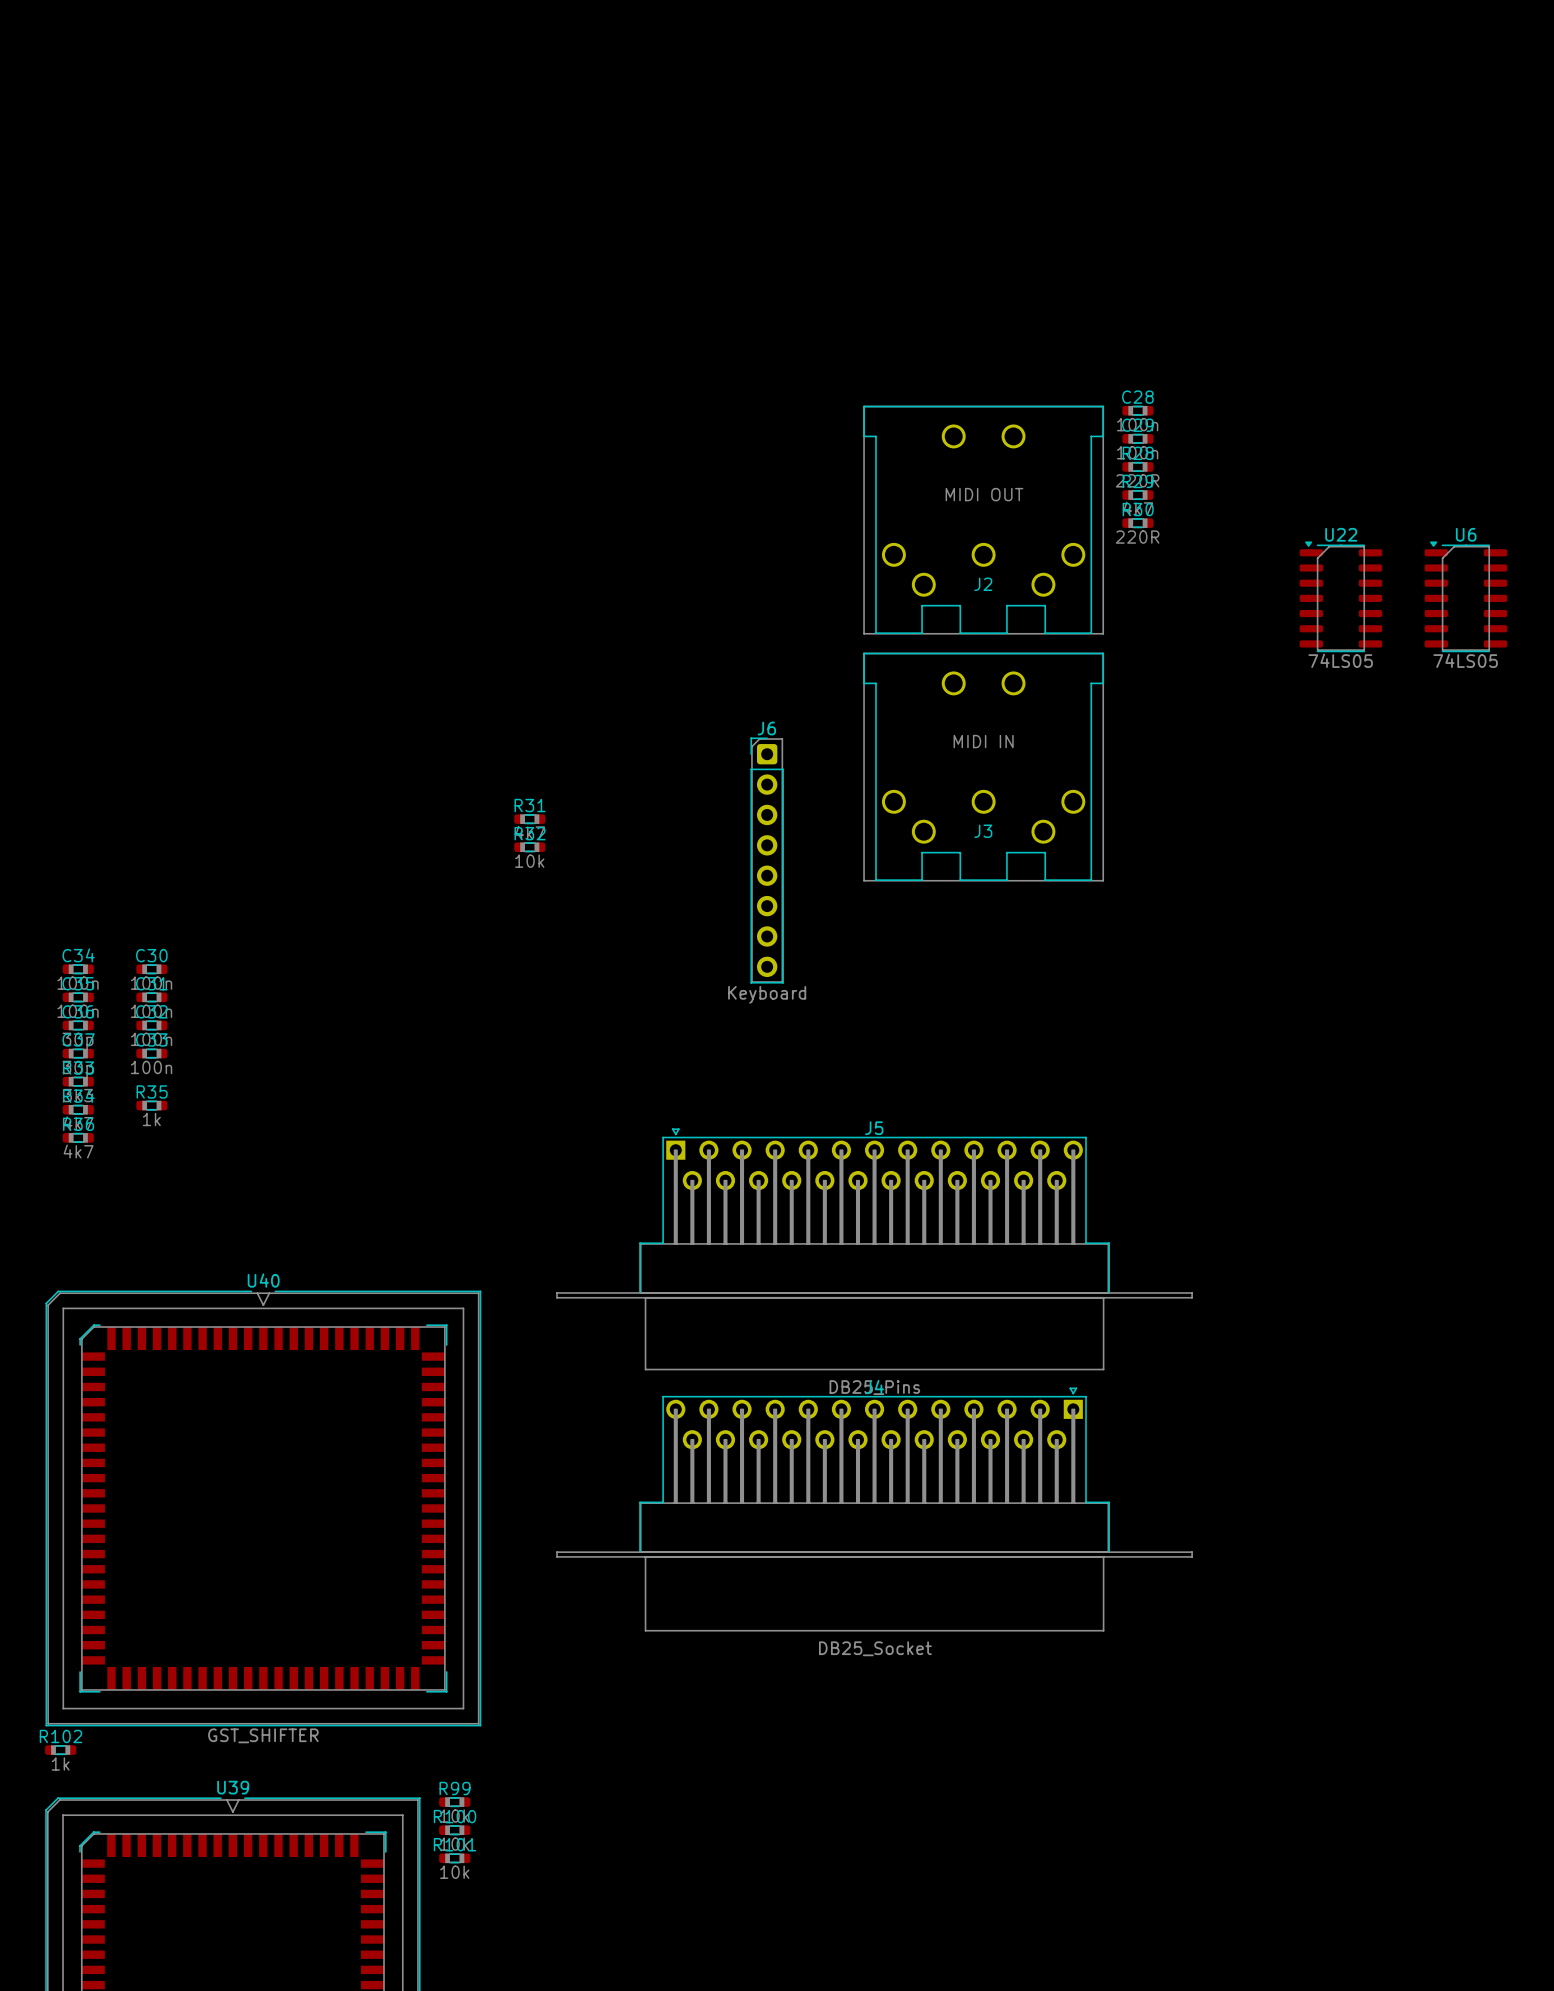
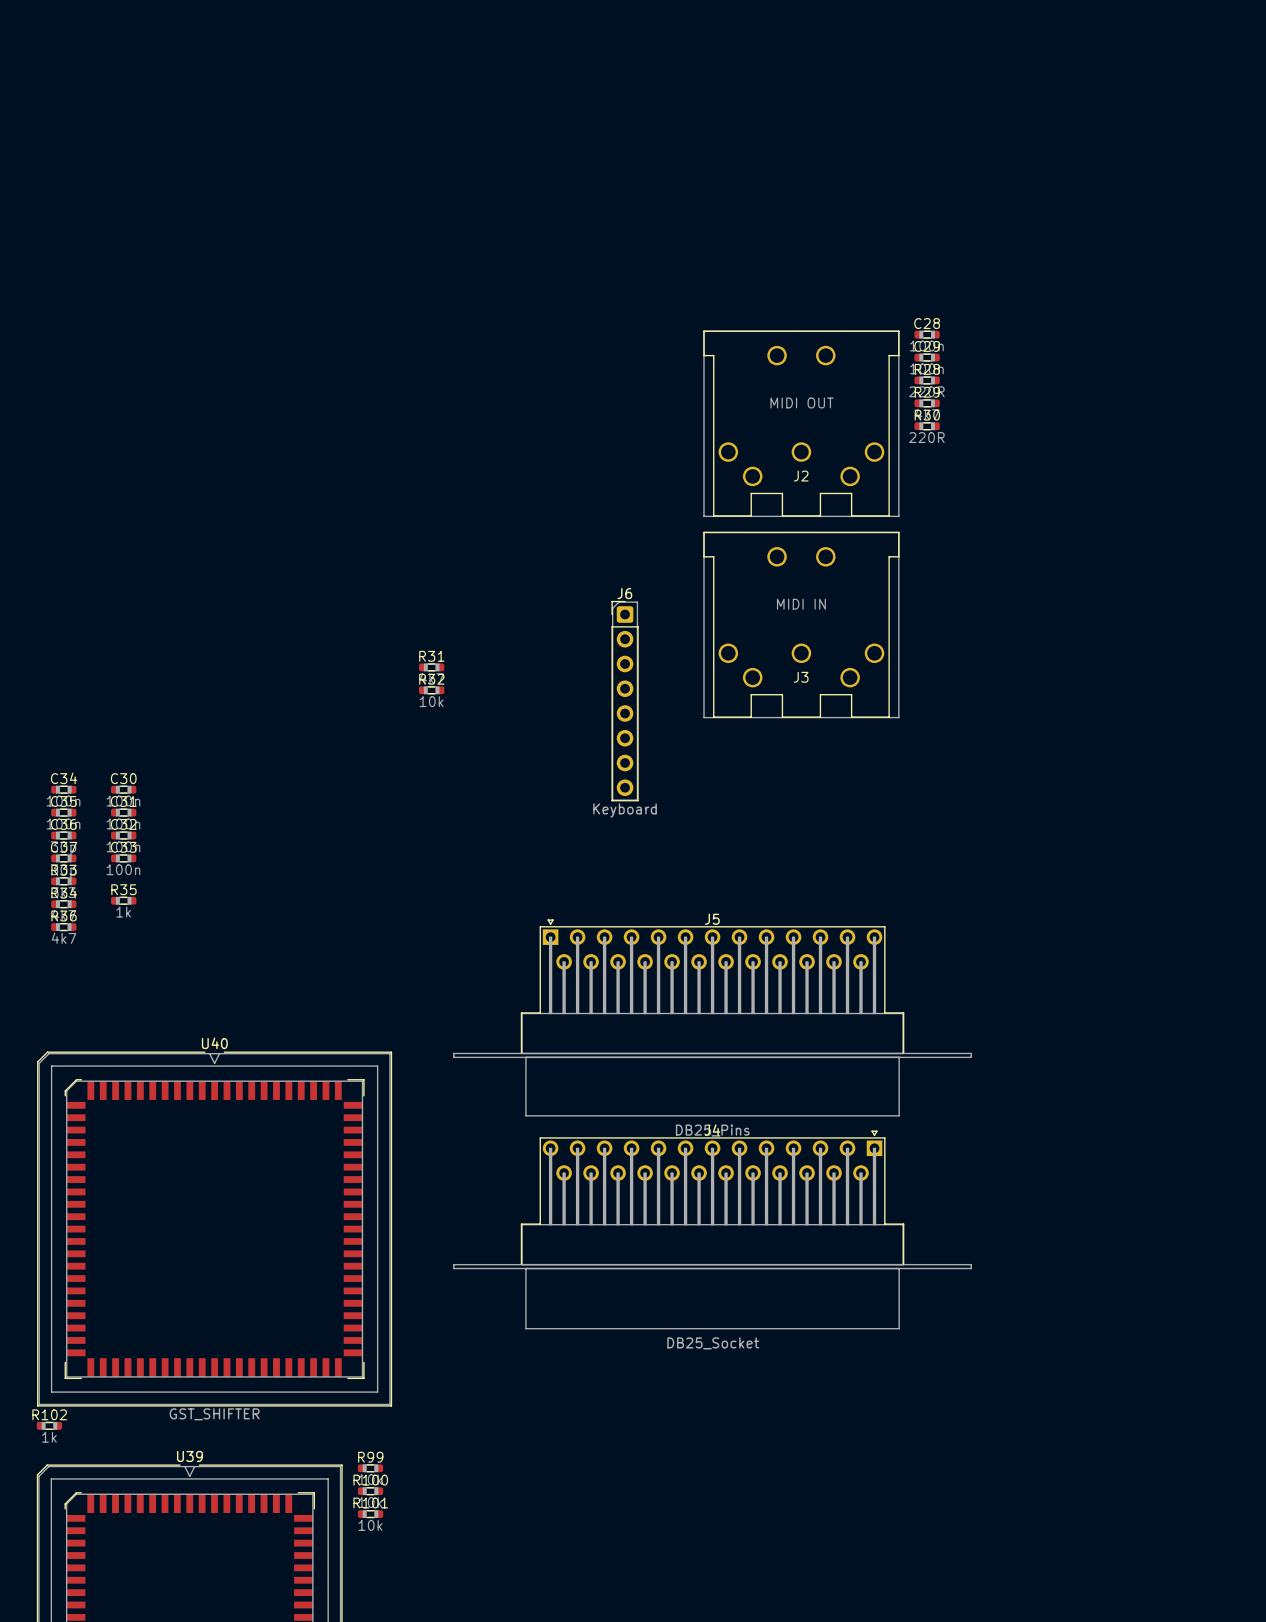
U22: 74LS05 (1340, 596) -> none
U6: 74LS05 (1465, 596) -> none

